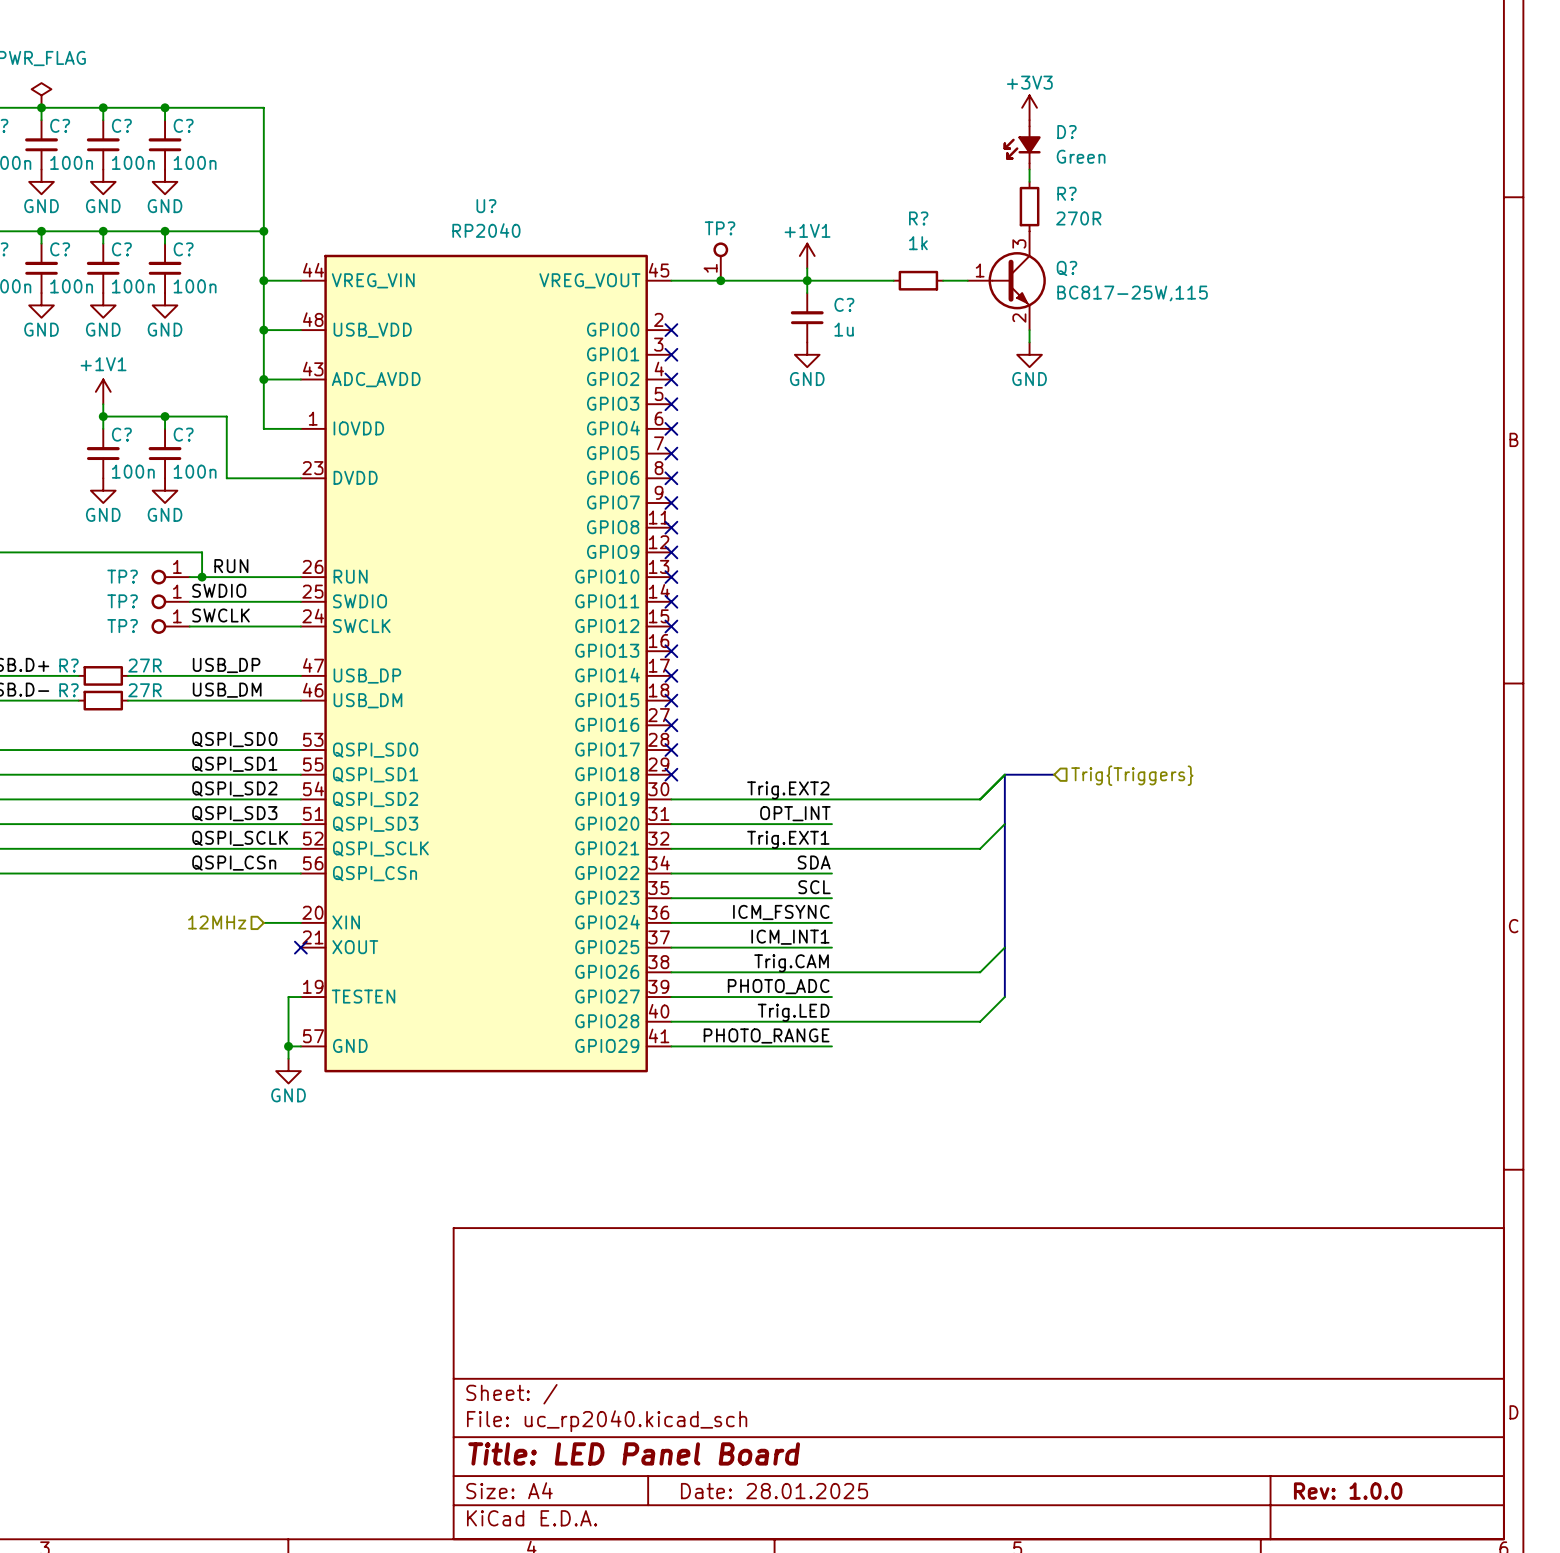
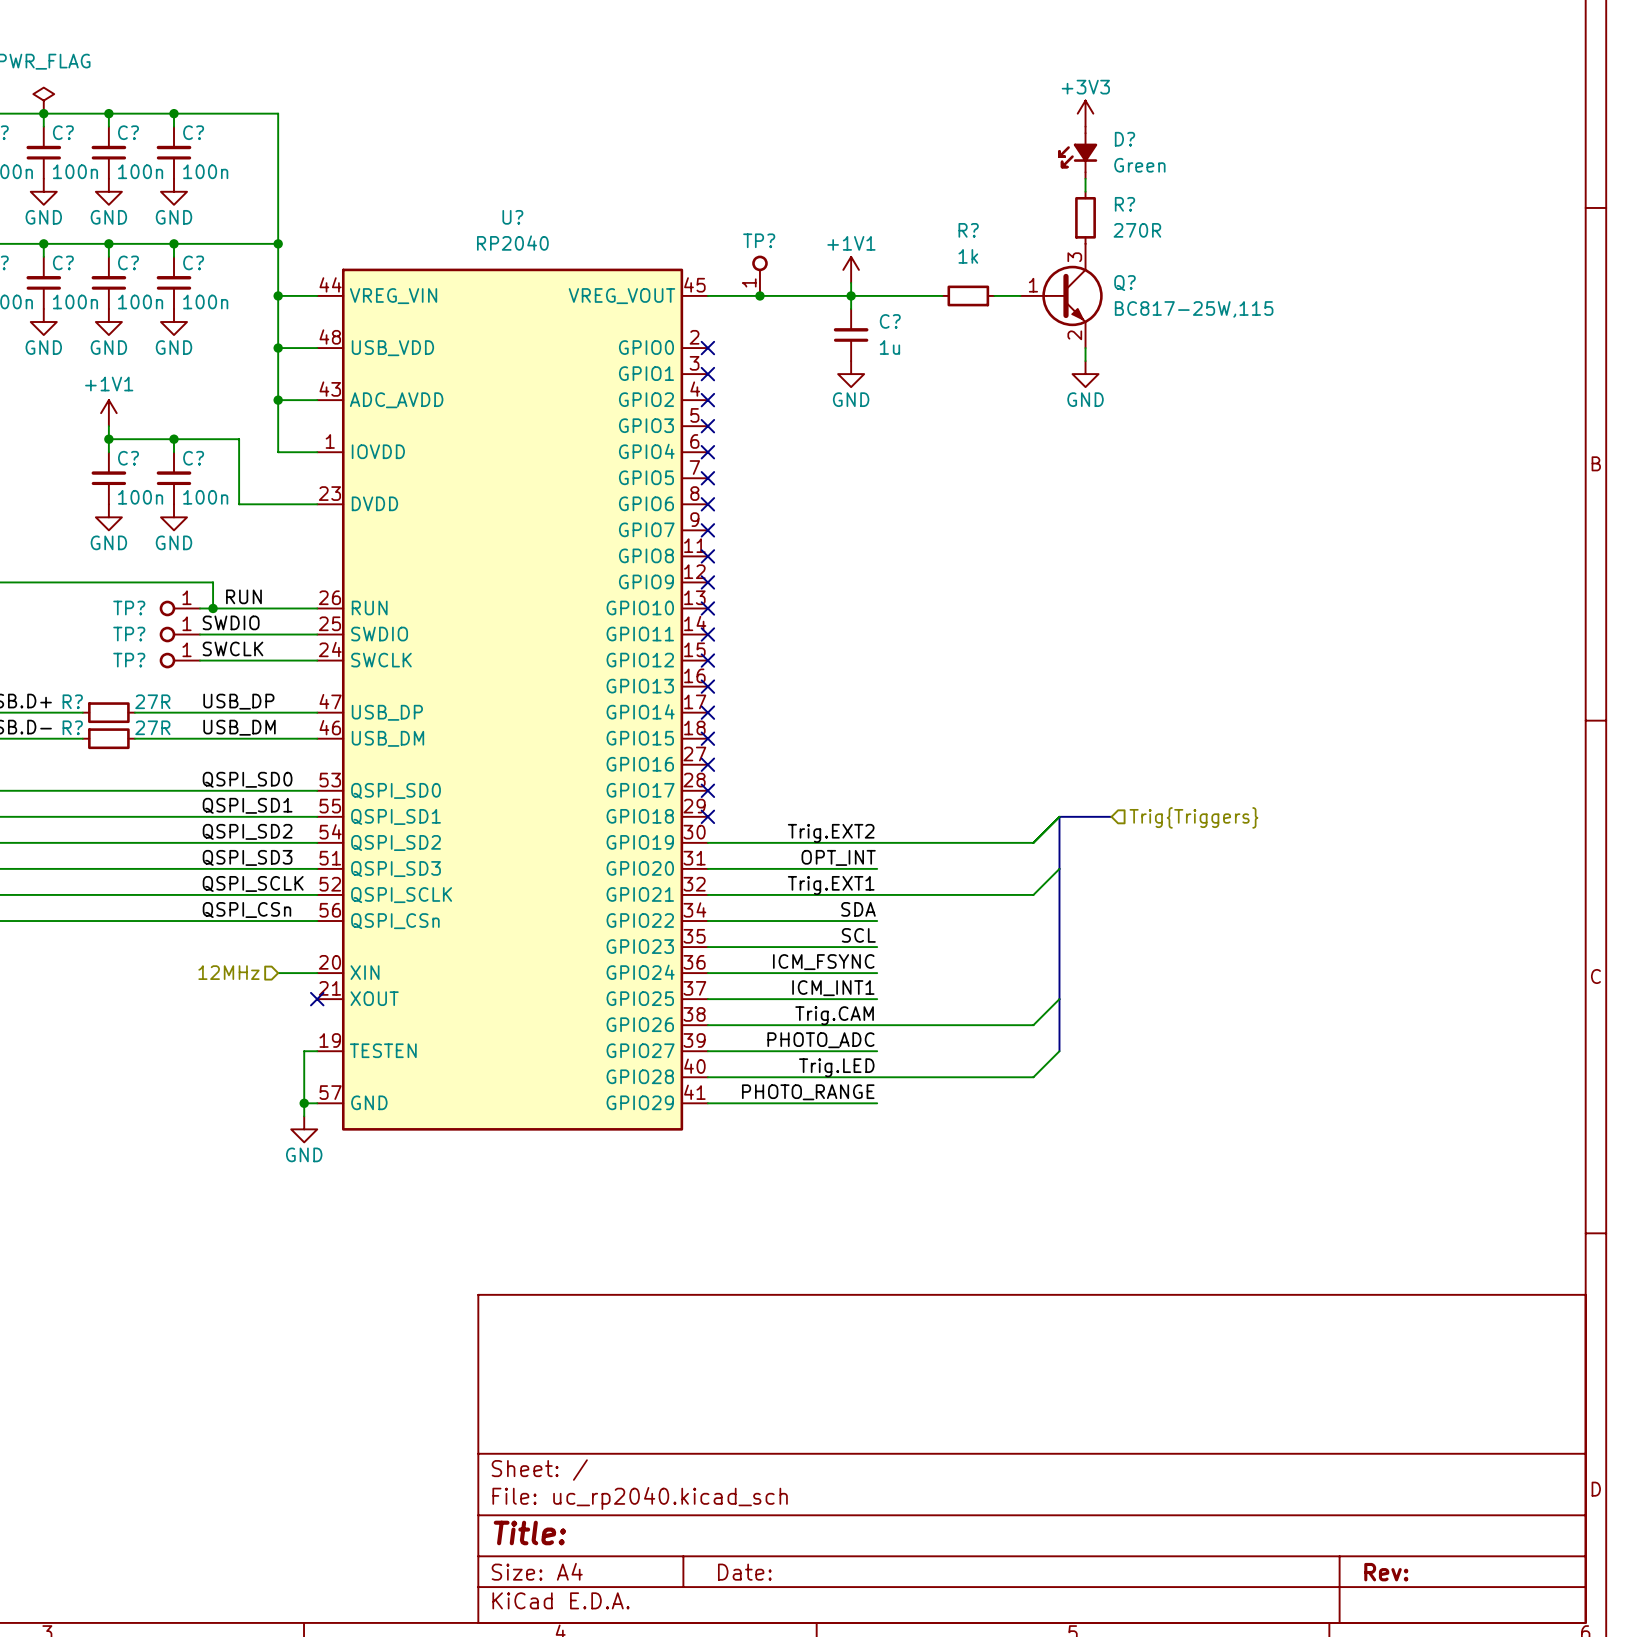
title block: Title: LED Panel Board (634, 1453) -> Title: (529, 1532)
title block: Date: 28.01.2025 (774, 1491) -> Date: (744, 1572)
title block: Rev: 1.0.0 (1348, 1491) -> Rev: (1386, 1572)

